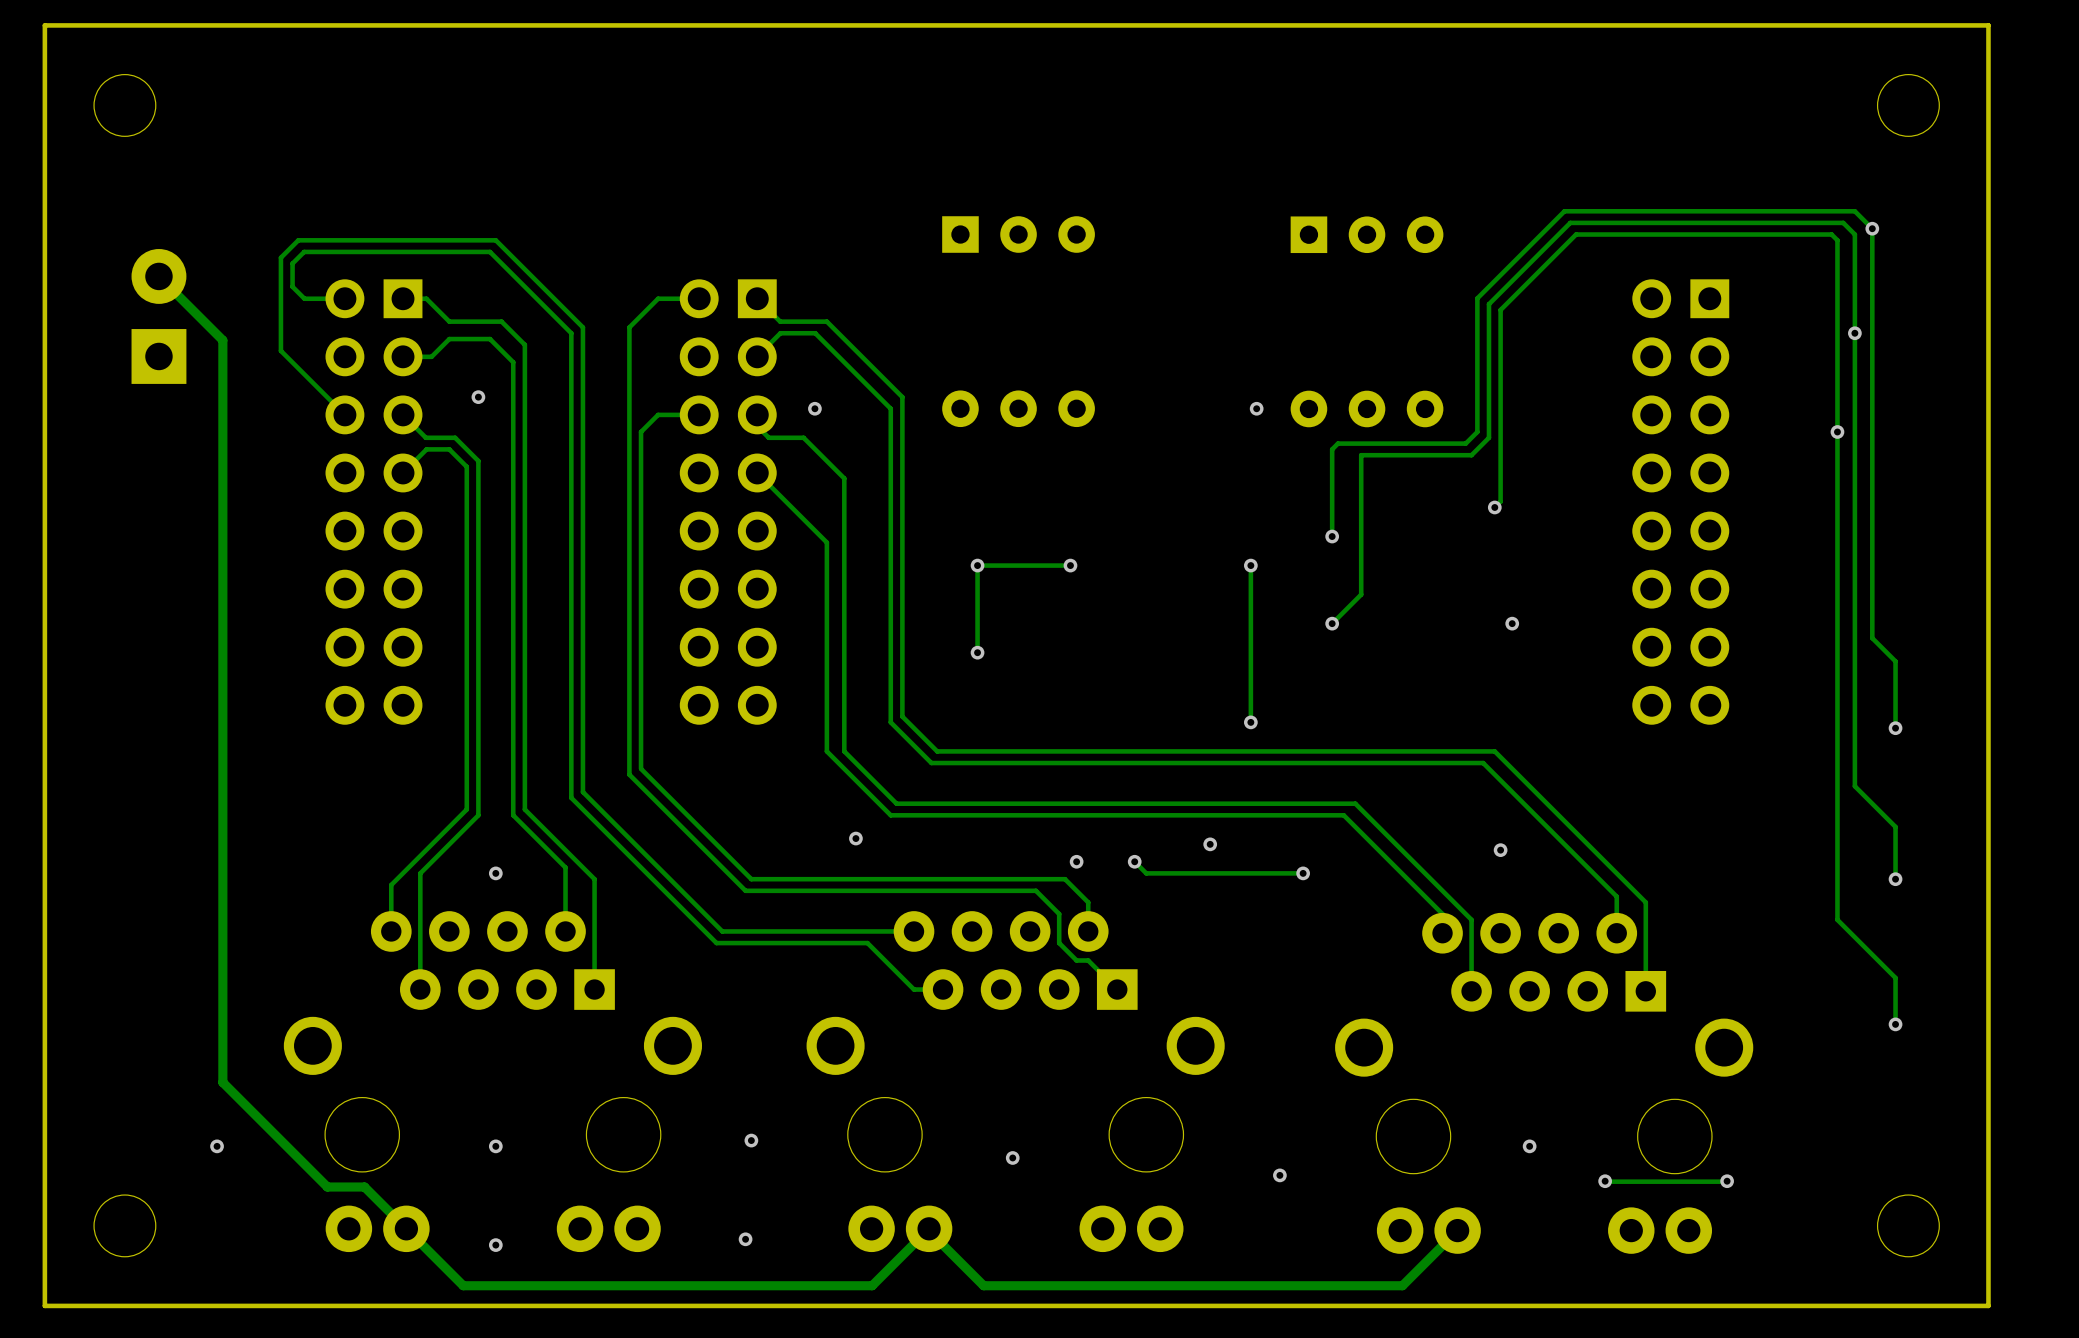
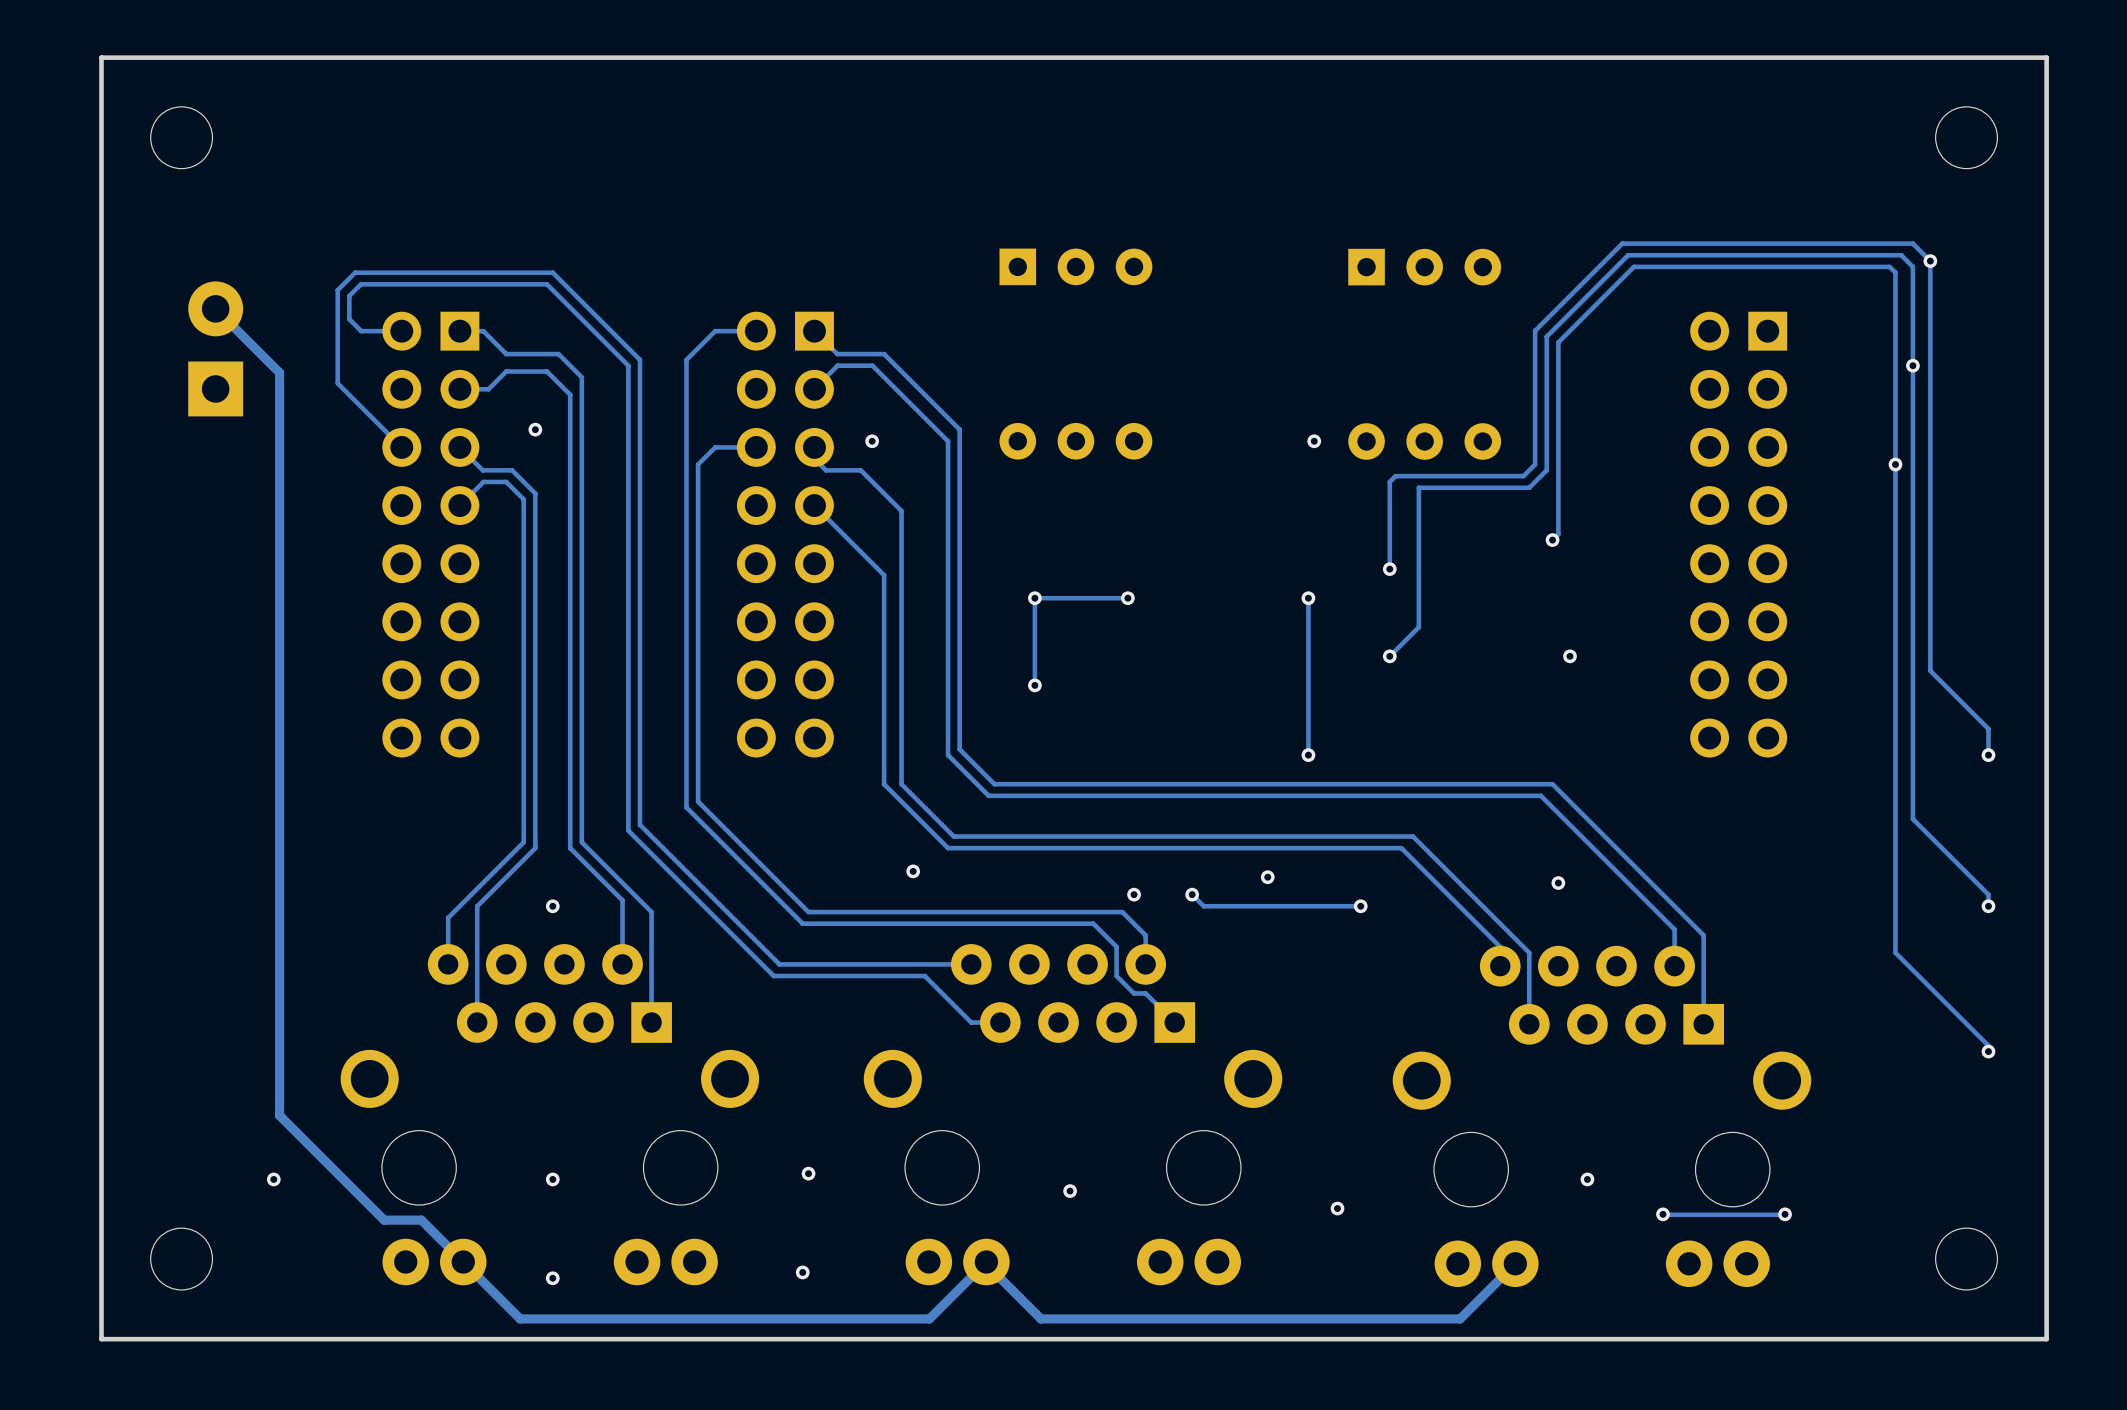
track: (1895, 661) (1895, 728) -> (1953, 694) (1988, 728) (1988, 755)
via position: (1895, 728) -> (1988, 755)
track: (1895, 826) (1895, 879) -> (1953, 859) (1988, 894) (1988, 906)
via position: (1895, 879) -> (1988, 906)
track: (1895, 977) (1895, 1024) -> (1953, 1010) (1988, 1045) (1988, 1051)
via position: (1895, 1024) -> (1988, 1051)

